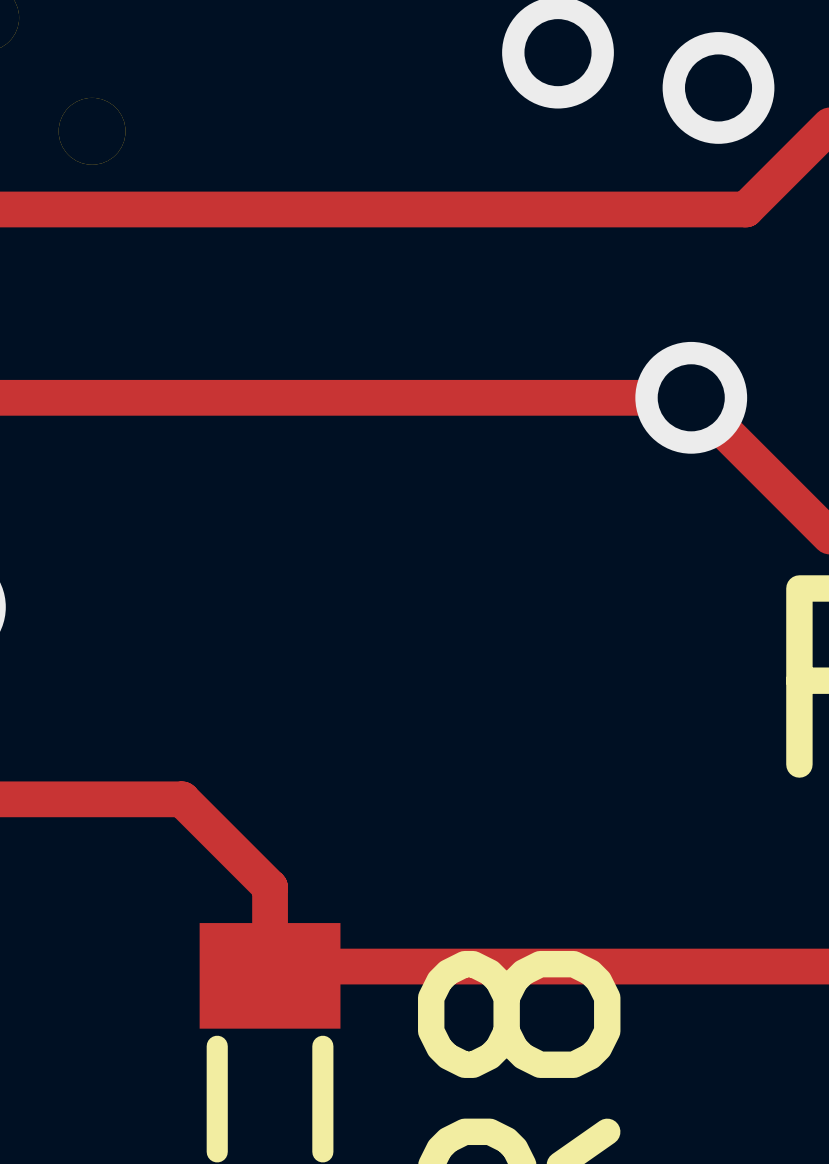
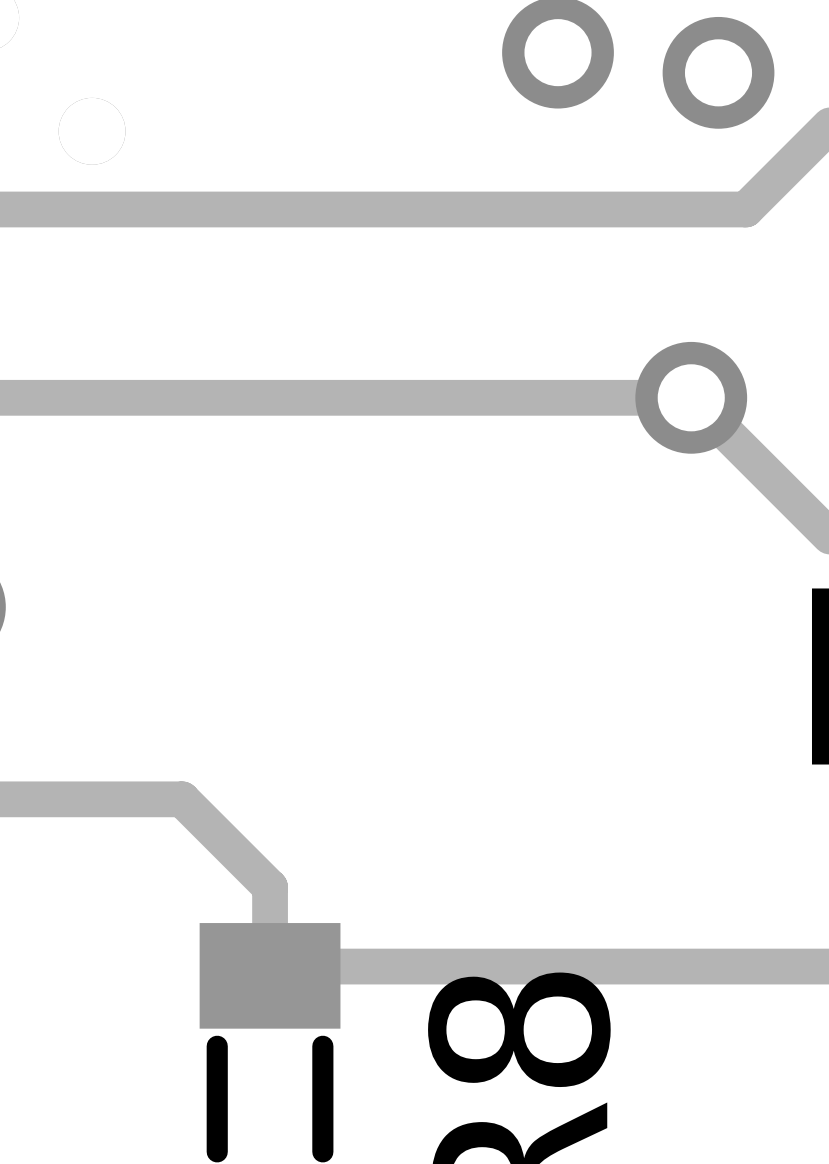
via position: (718, 87) -> (718, 72)

